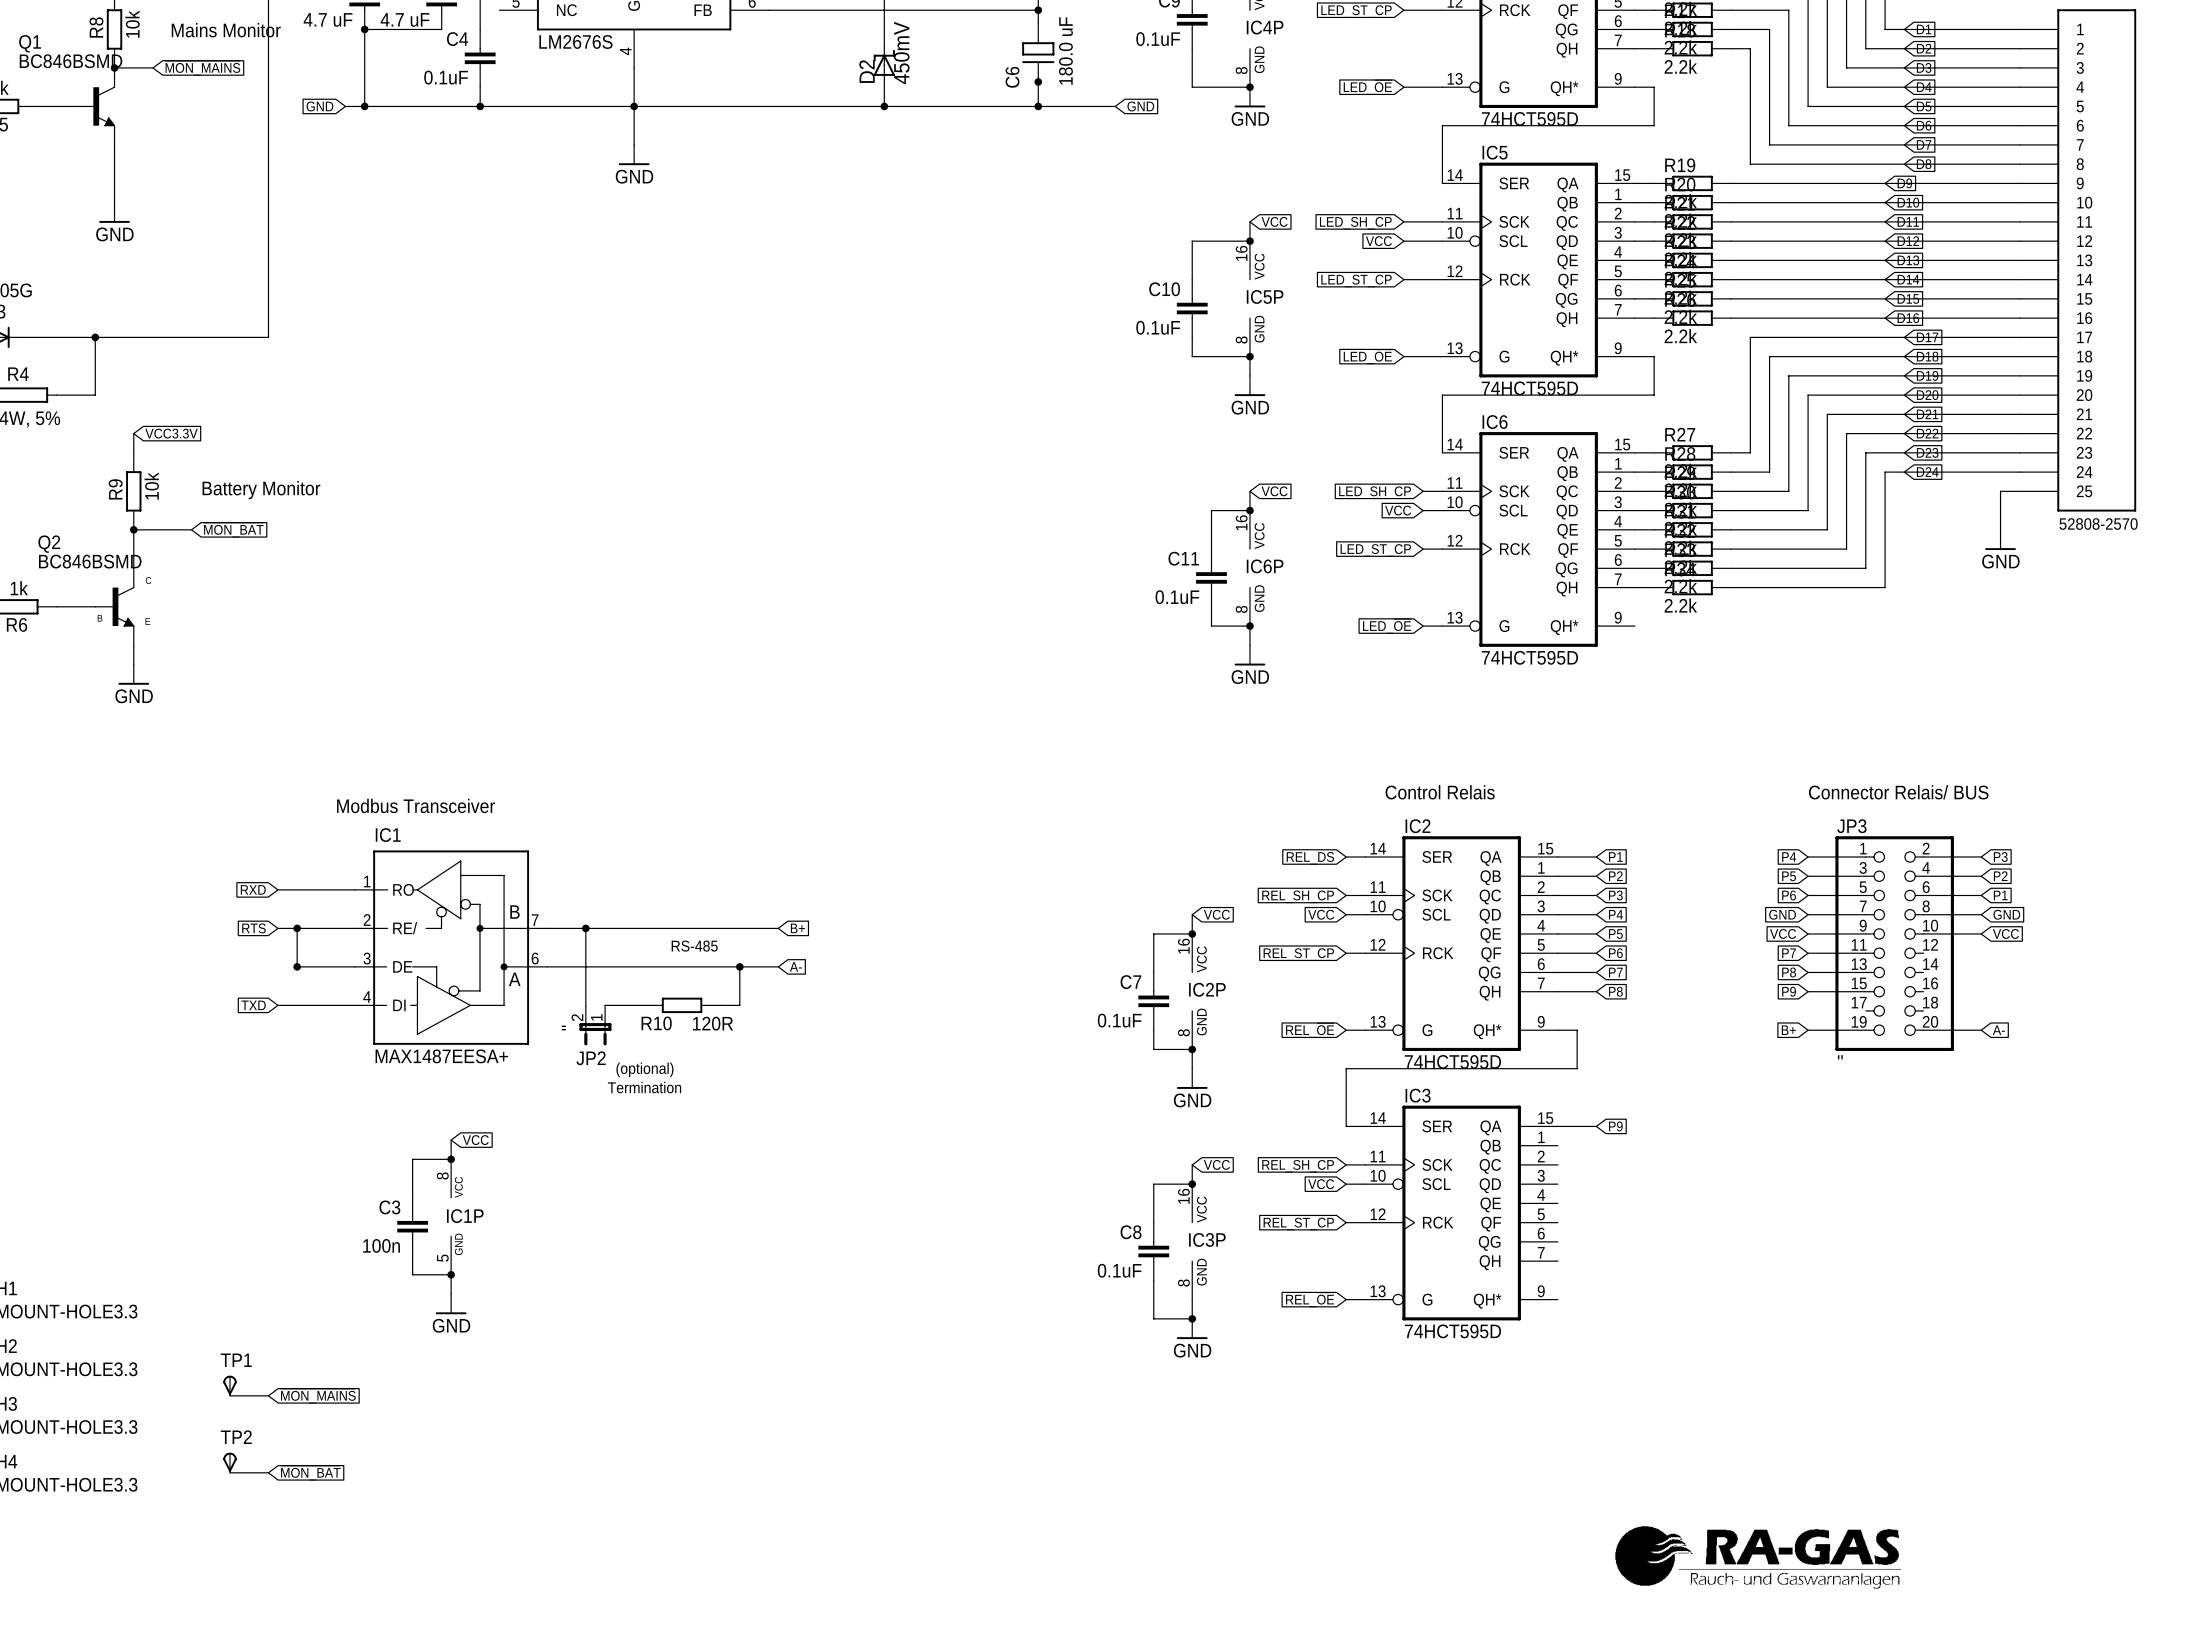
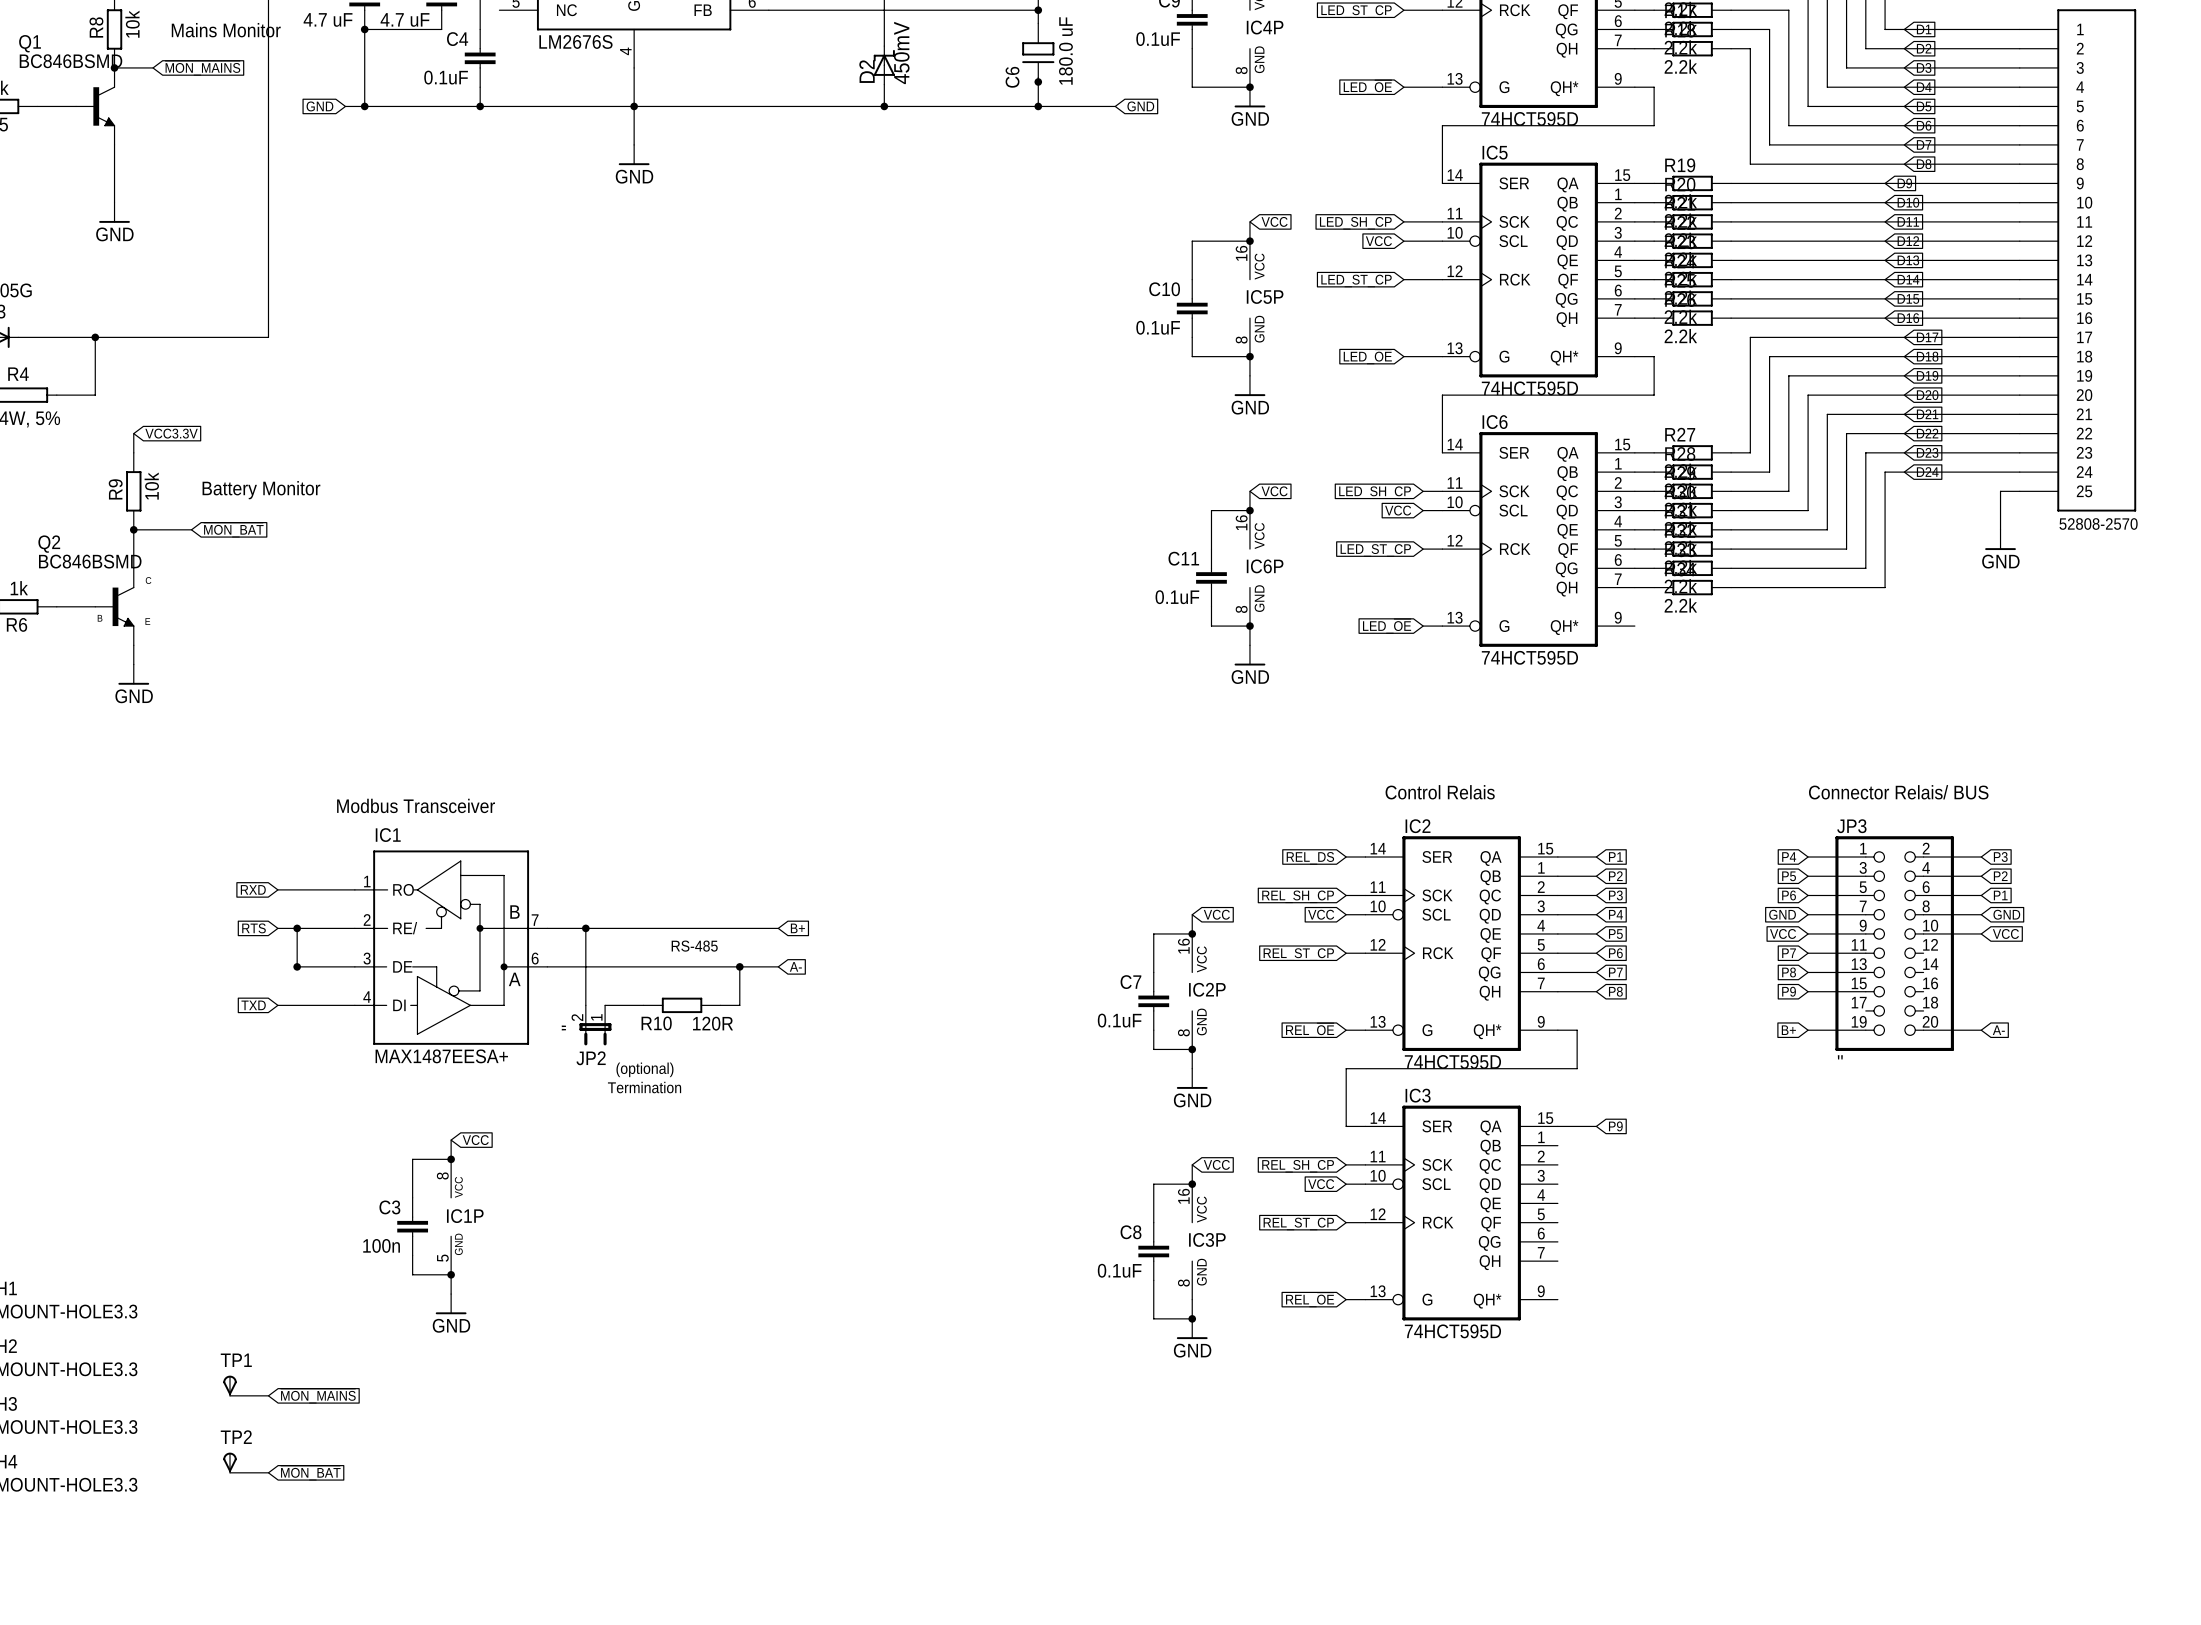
part: (1758, 1557) -> none

